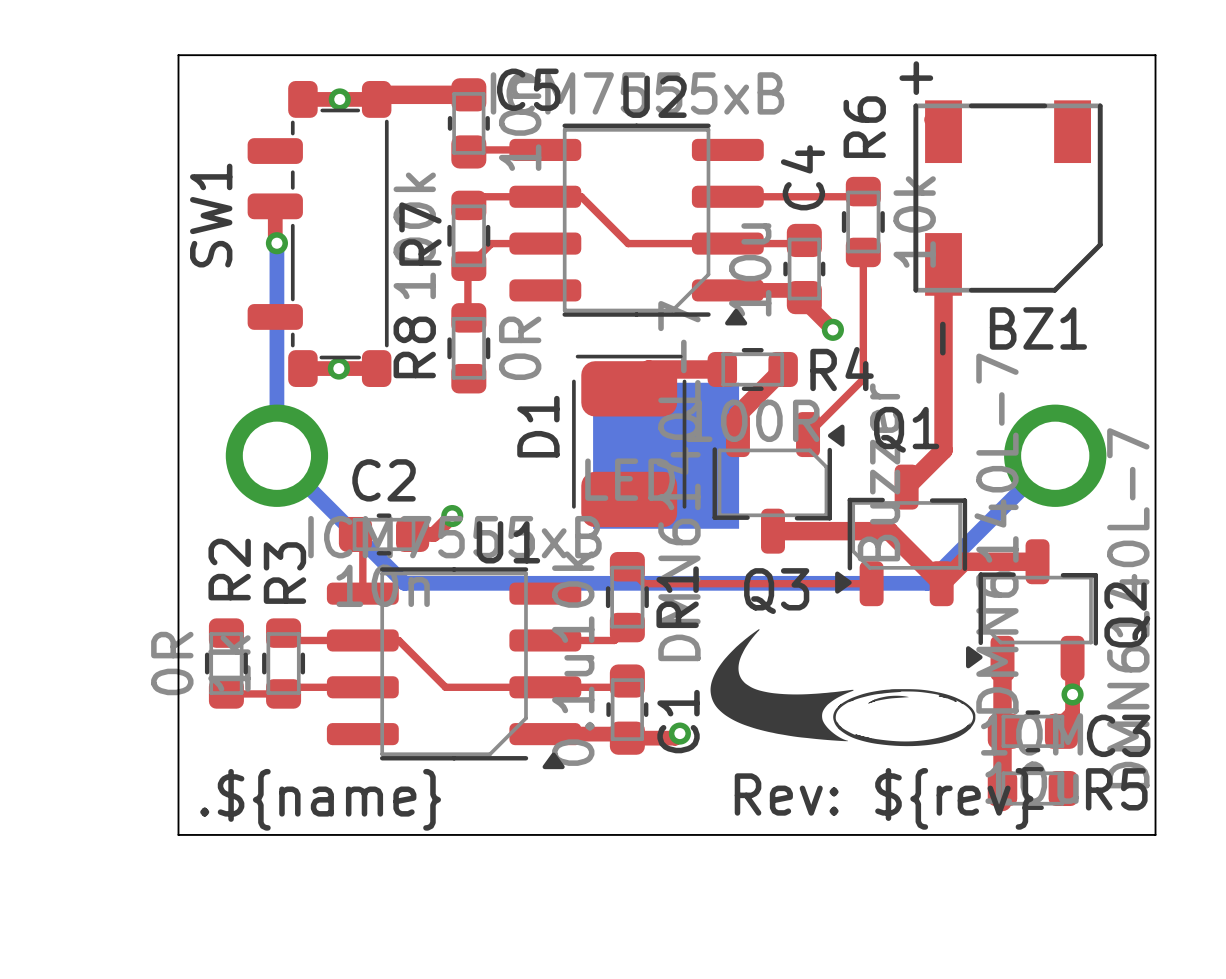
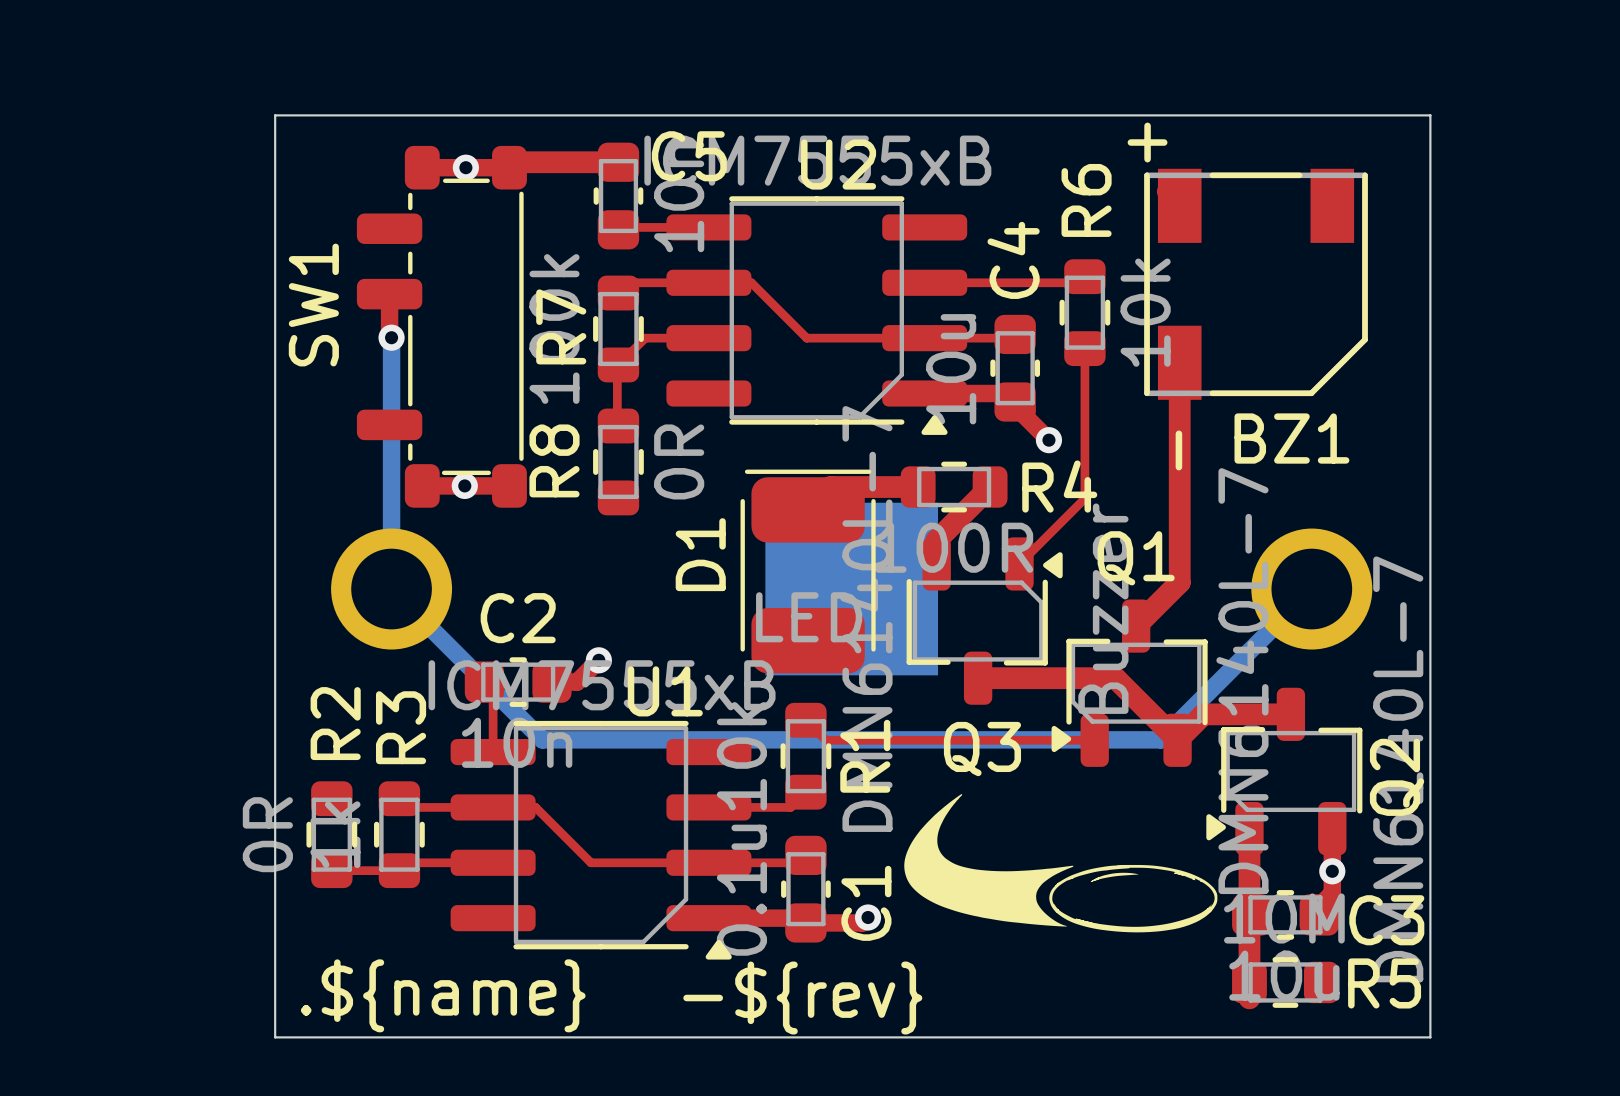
text: Rev: ${rev} (884, 798) -> -${rev} (802, 998)

